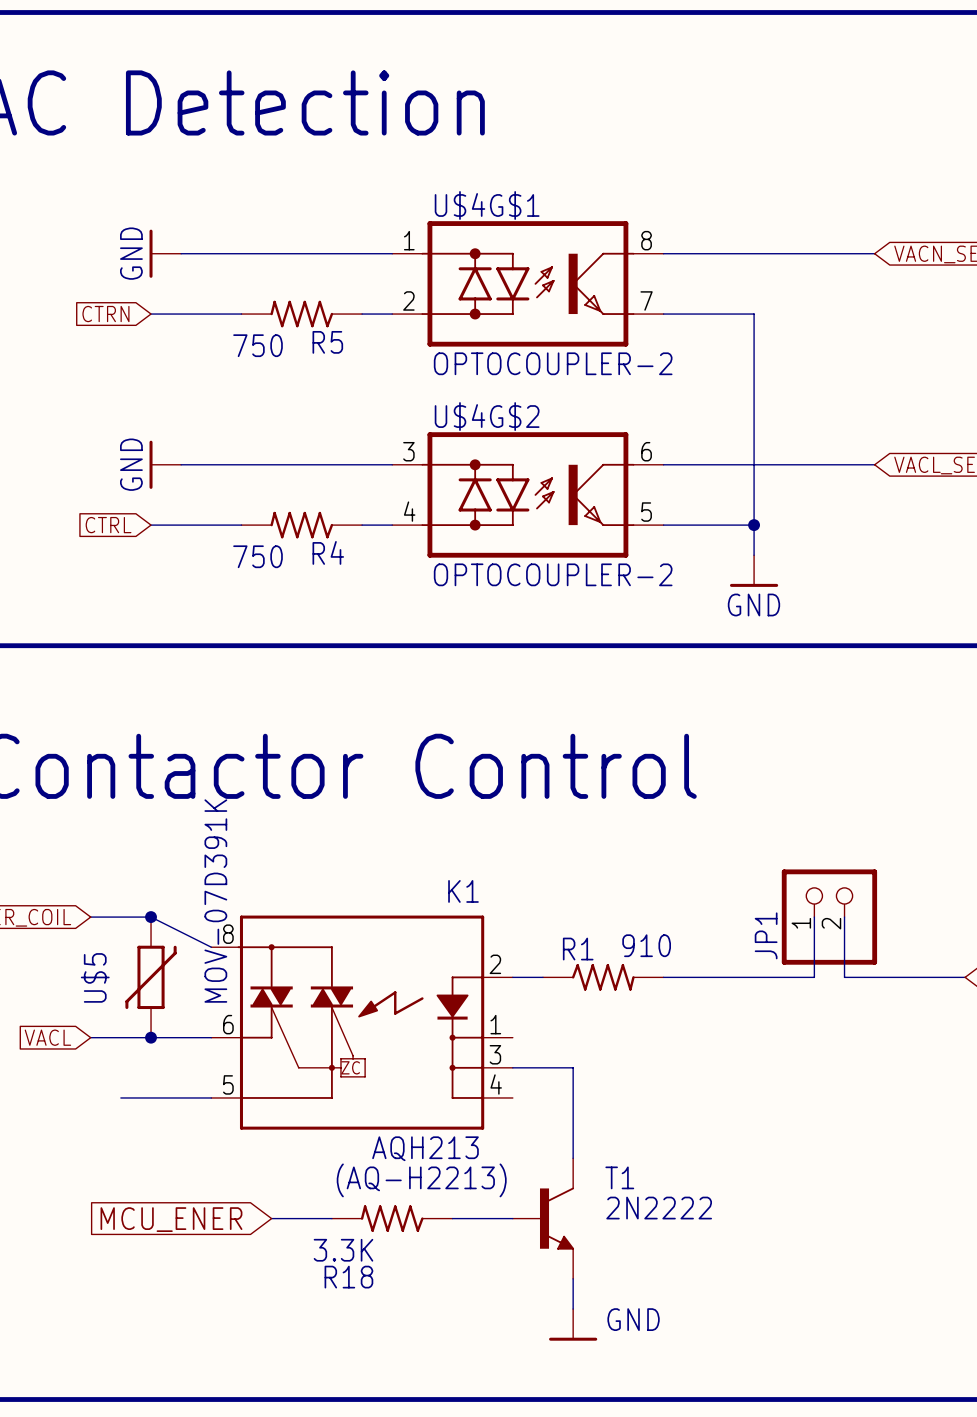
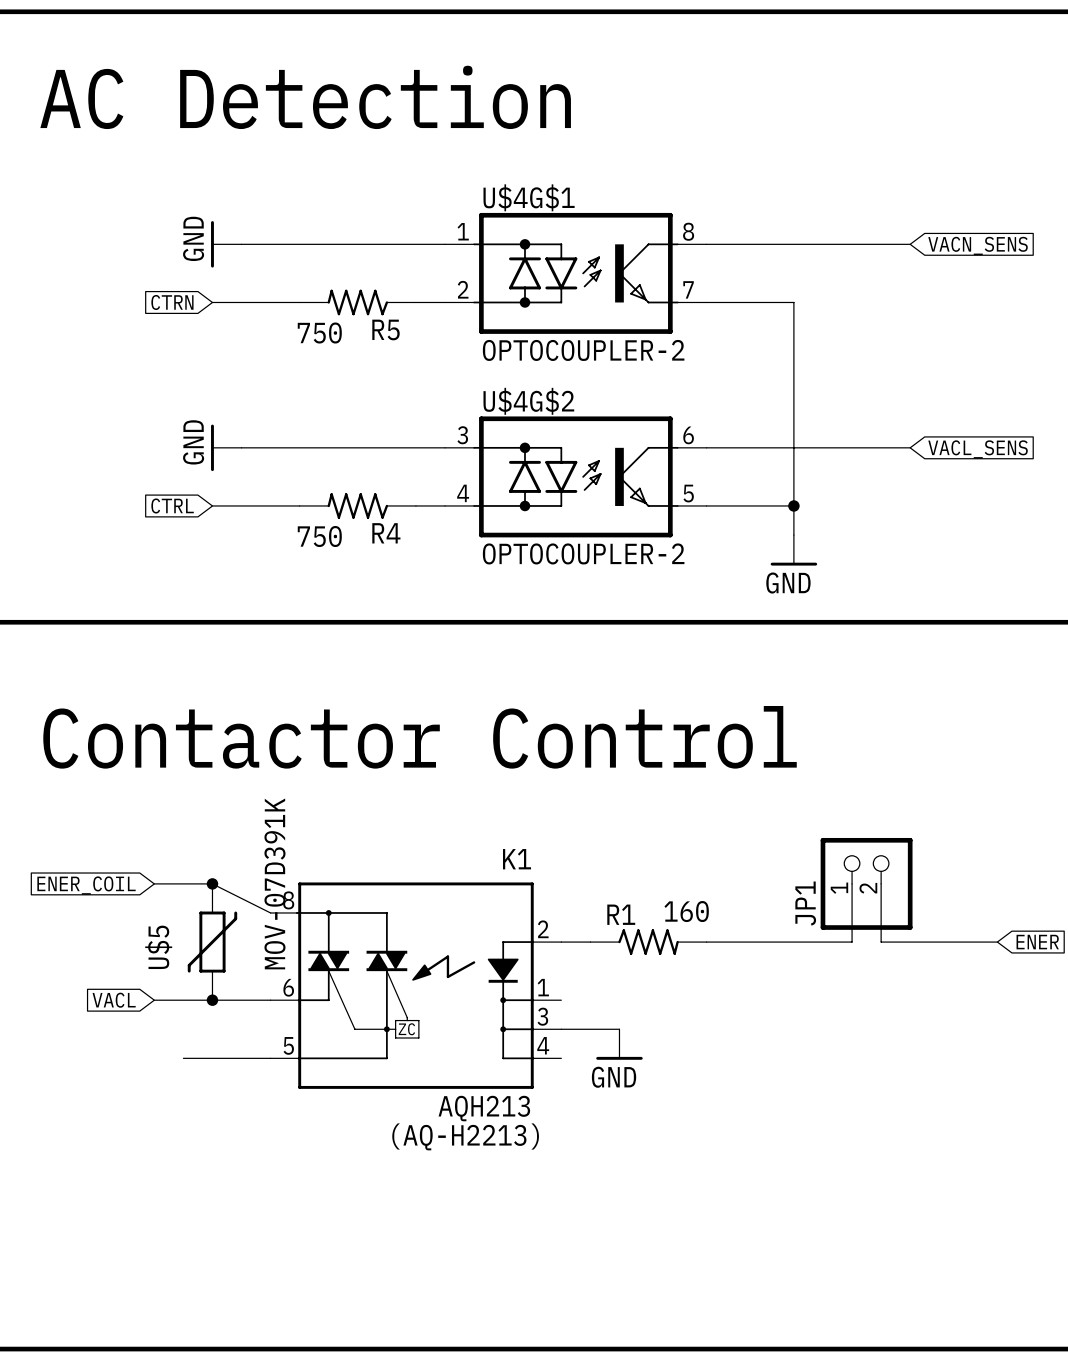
R1 value: 910 (646, 945) -> 160 (686, 911)
wire: (573, 1067) (573, 1158) -> none
wire: (271, 1218) (331, 1218) -> none
R18: 3.3K (392, 1218) -> none
wire: (452, 1218) (512, 1218) -> none
T1: 2N2222 (543, 1218) -> none
global label: MCU_ENER (171, 1219) -> none
wire: (573, 1278) (573, 1309) -> none
power symbol text position: GND (633, 1319) -> GND (614, 1077)
power symbol position: GND (573, 1324) -> GND (619, 1044)

